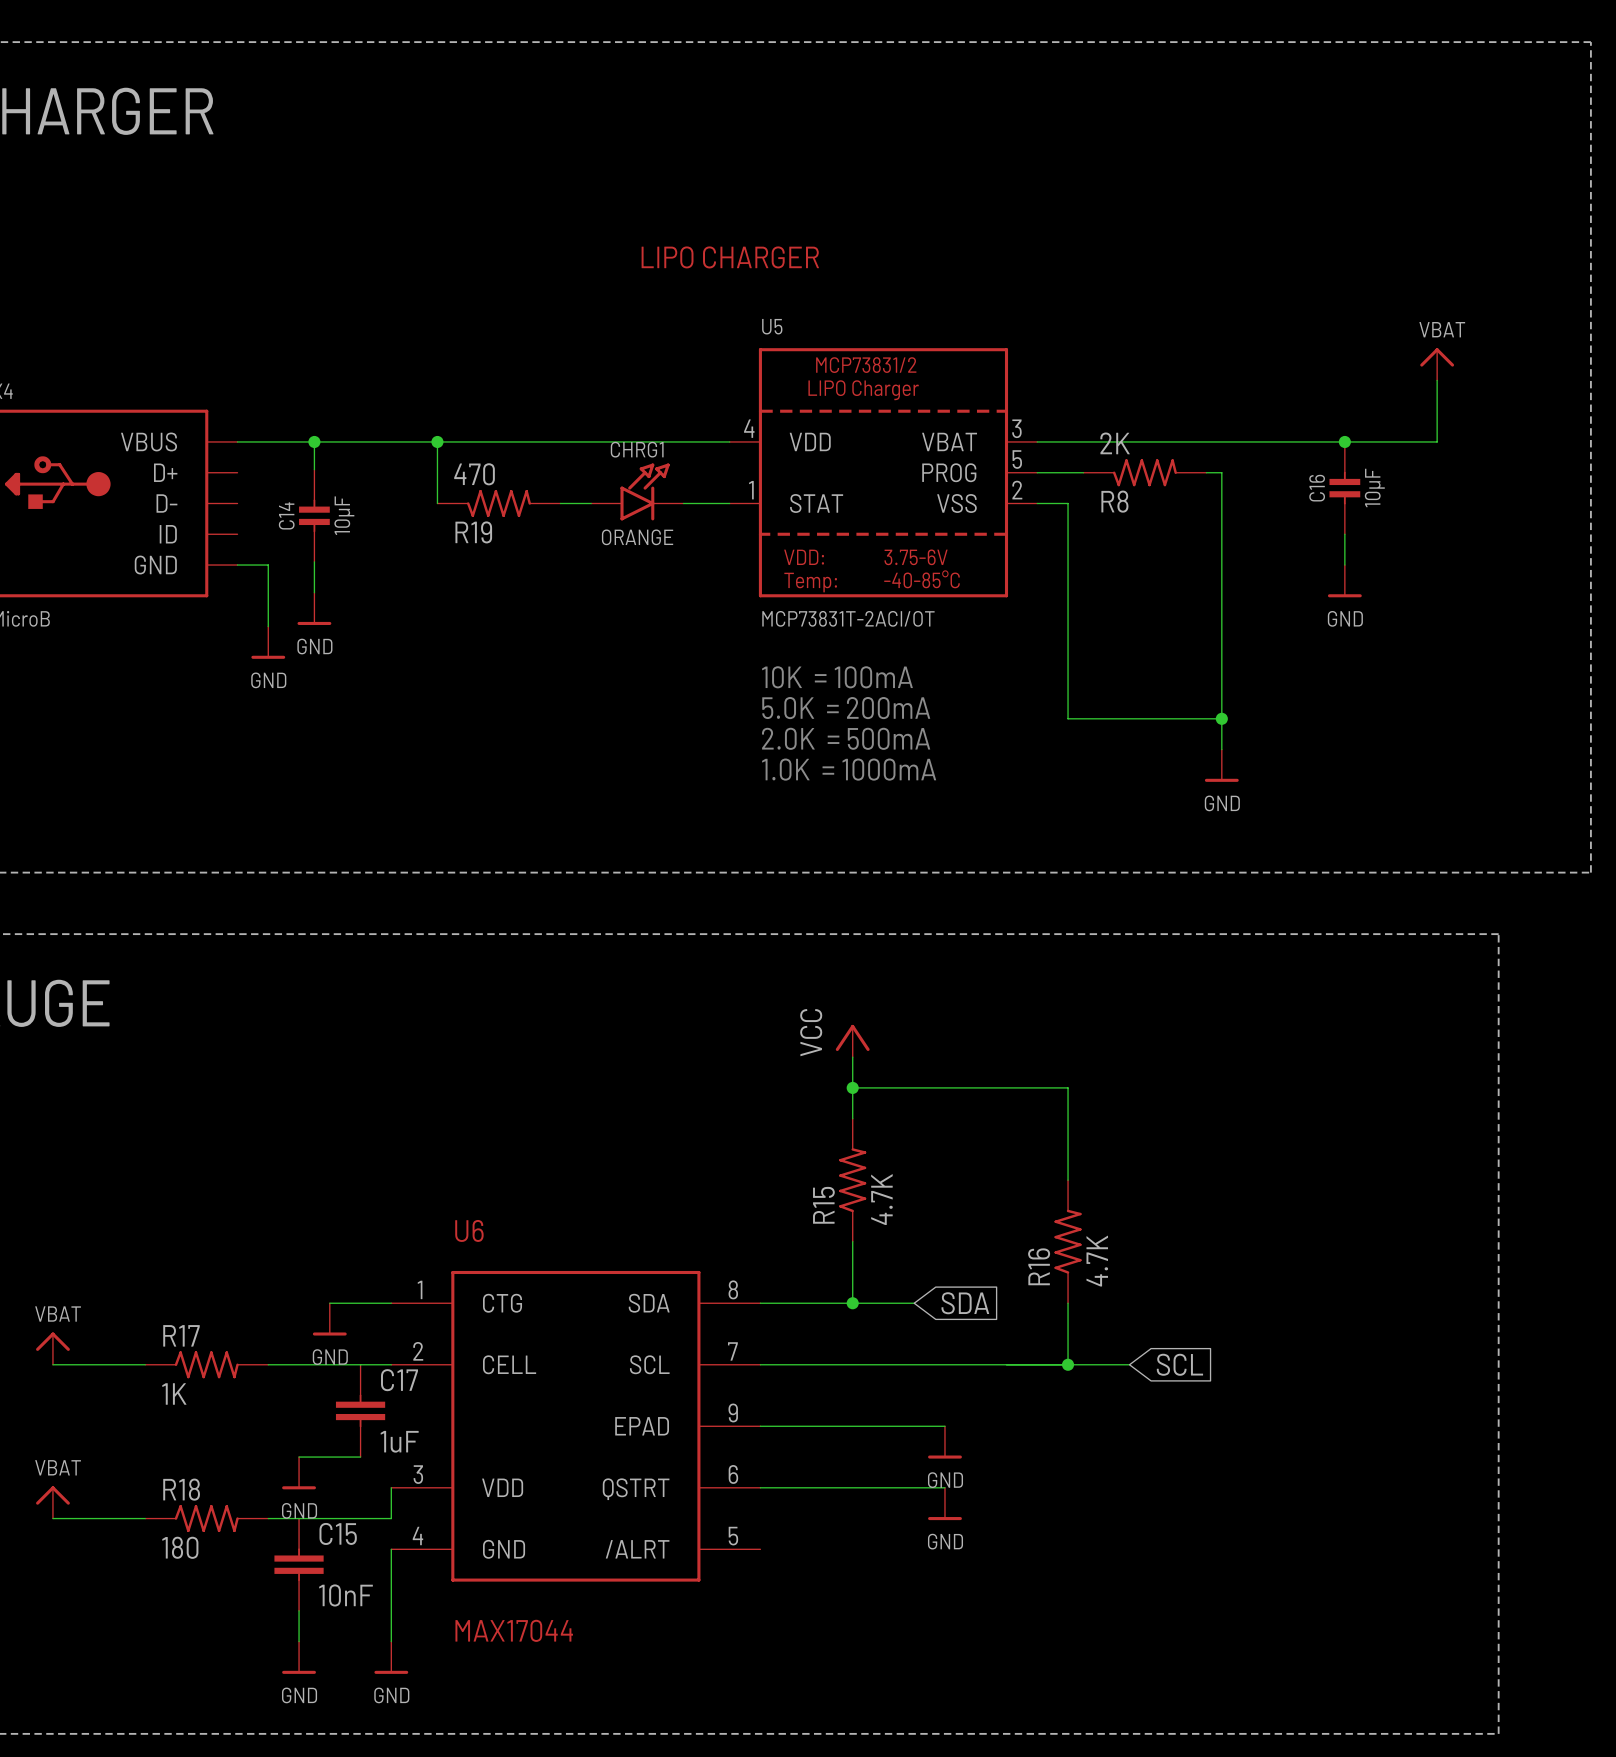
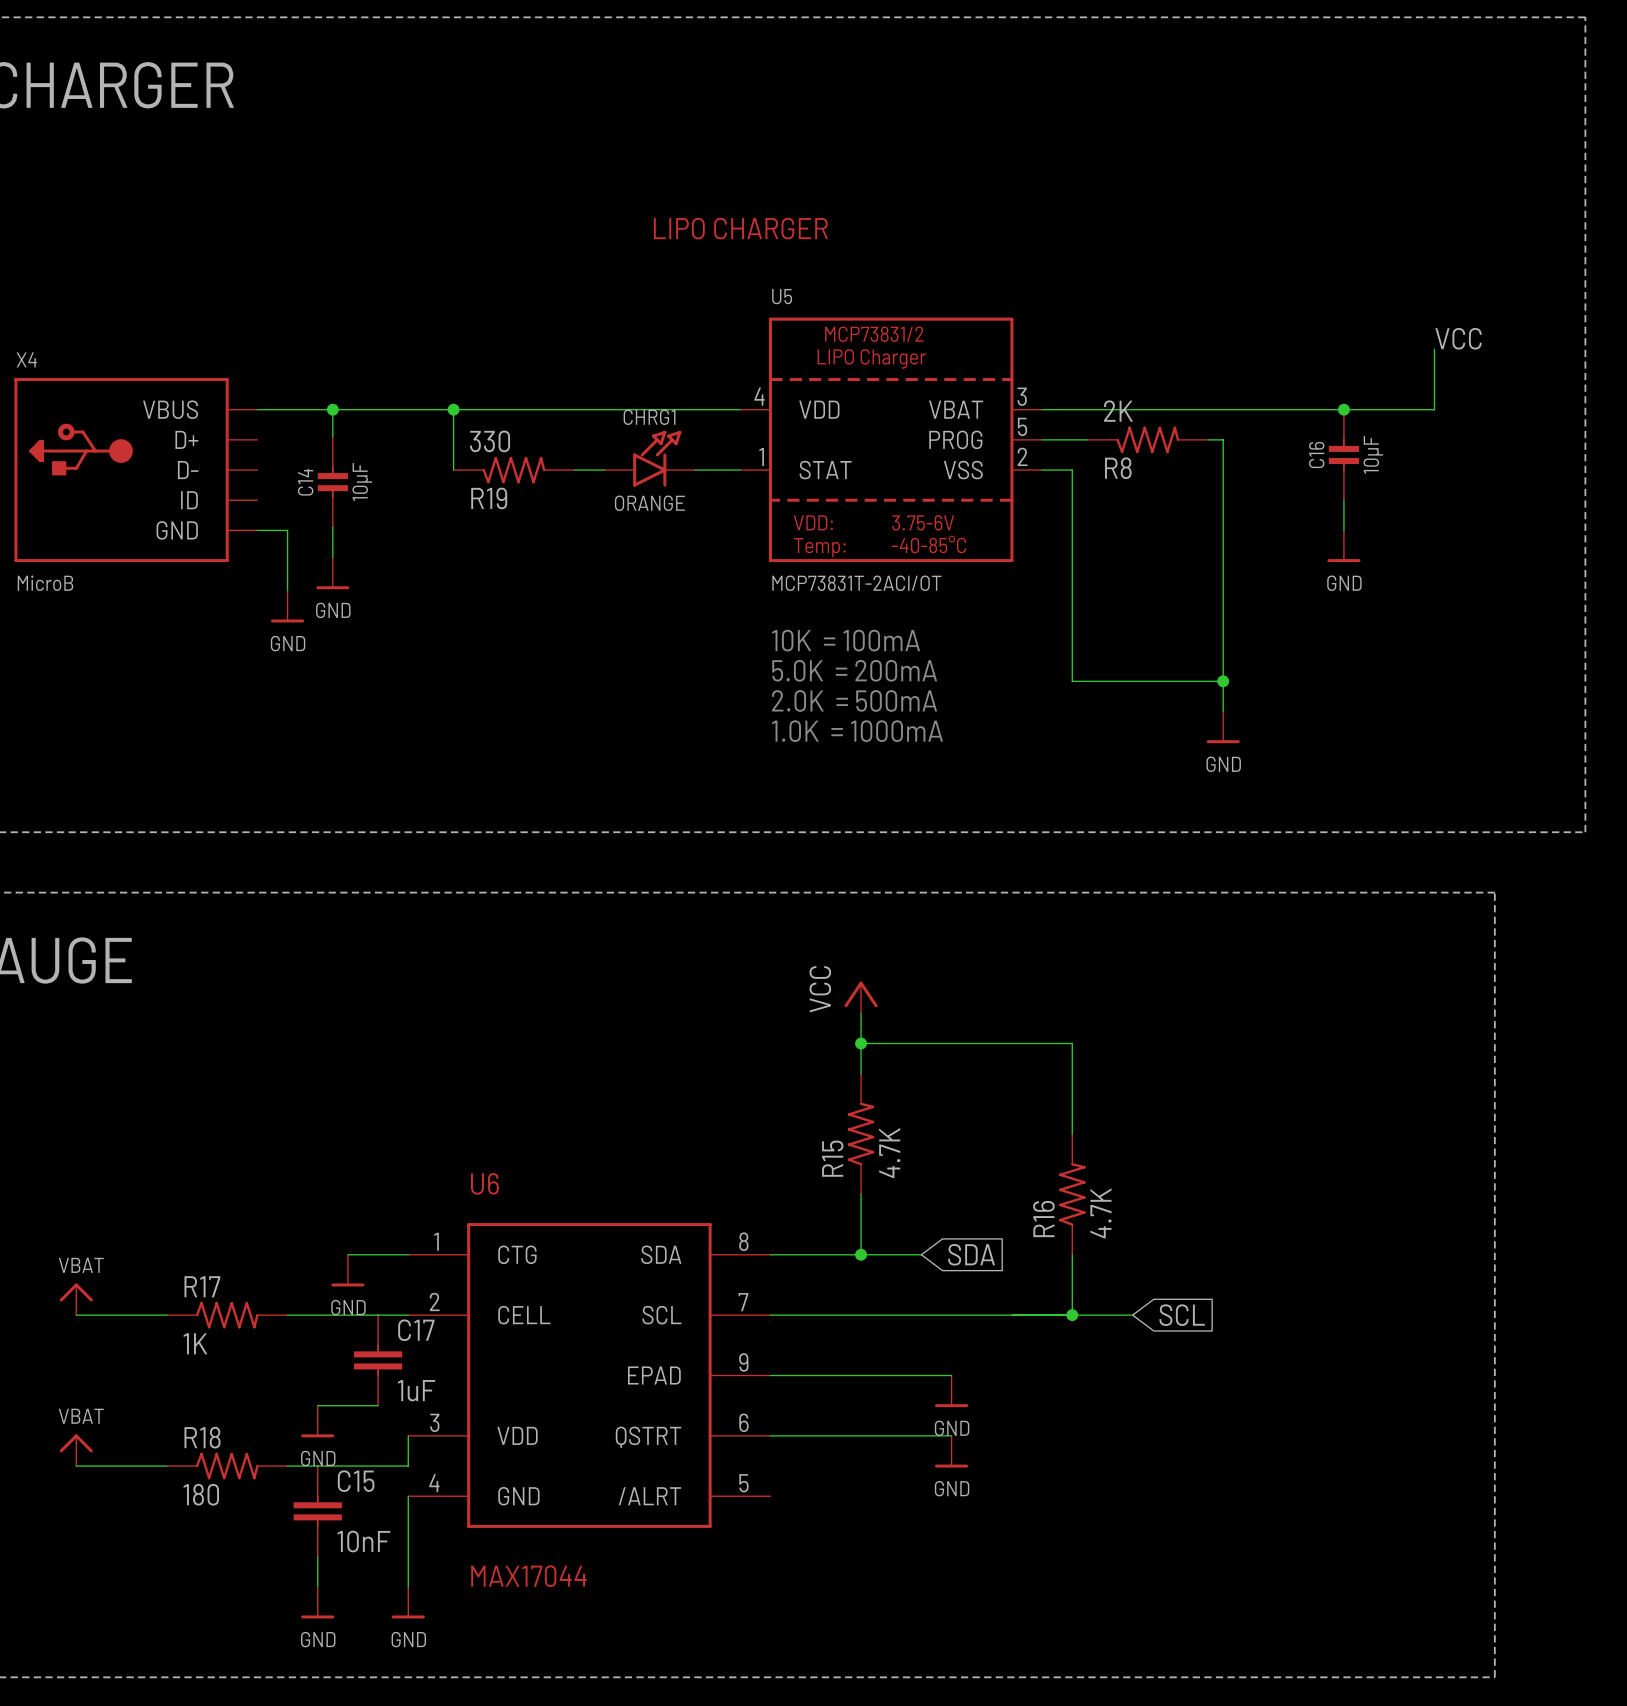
power symbol: VBAT (1437, 364) -> none
label: none -> VCC (1458, 338)
R19 value: 470 (474, 474) -> 330 (490, 441)

